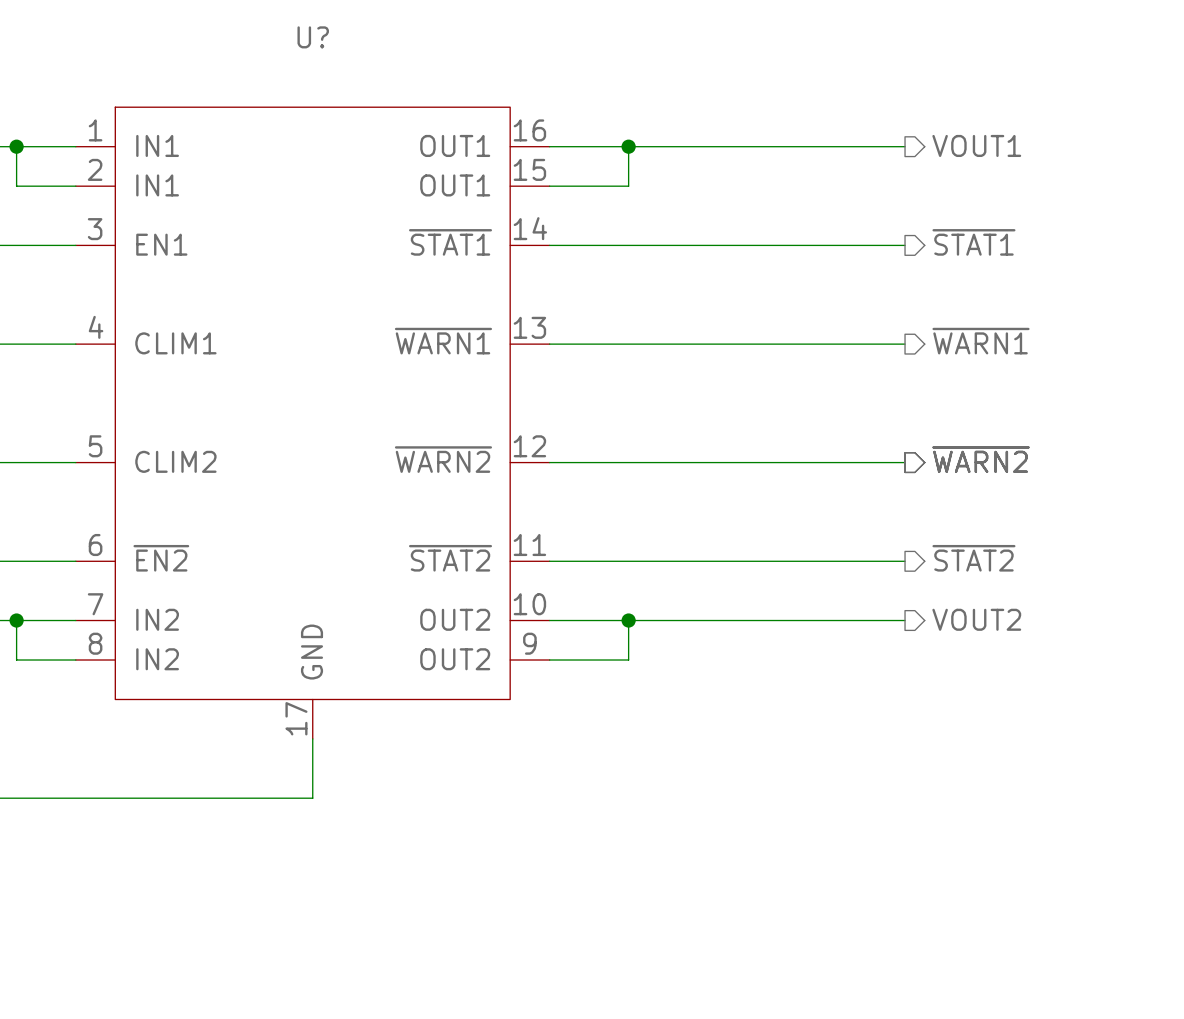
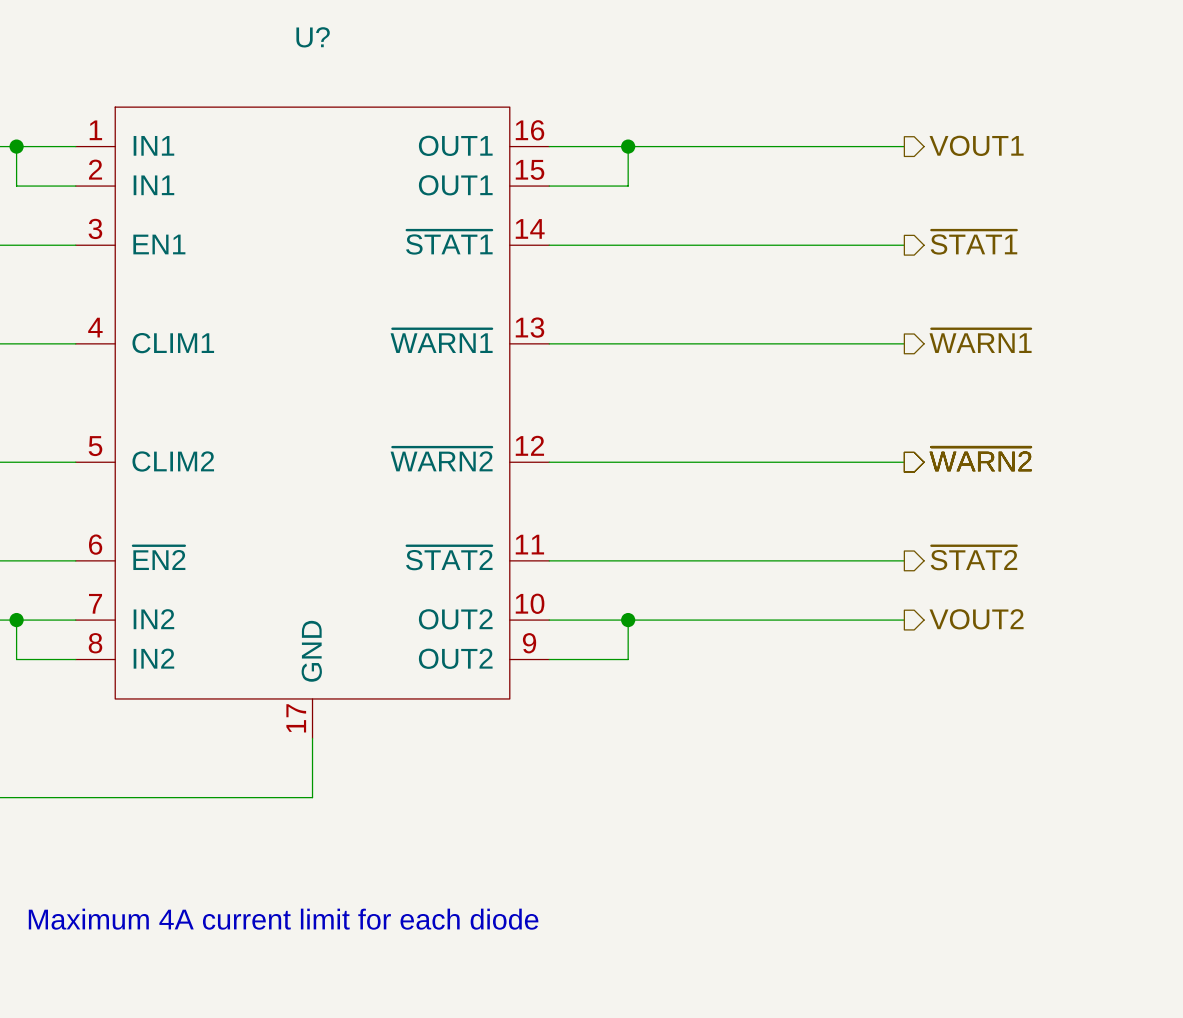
text: none -> Maximum 4A current limit for each diode (283, 919)

